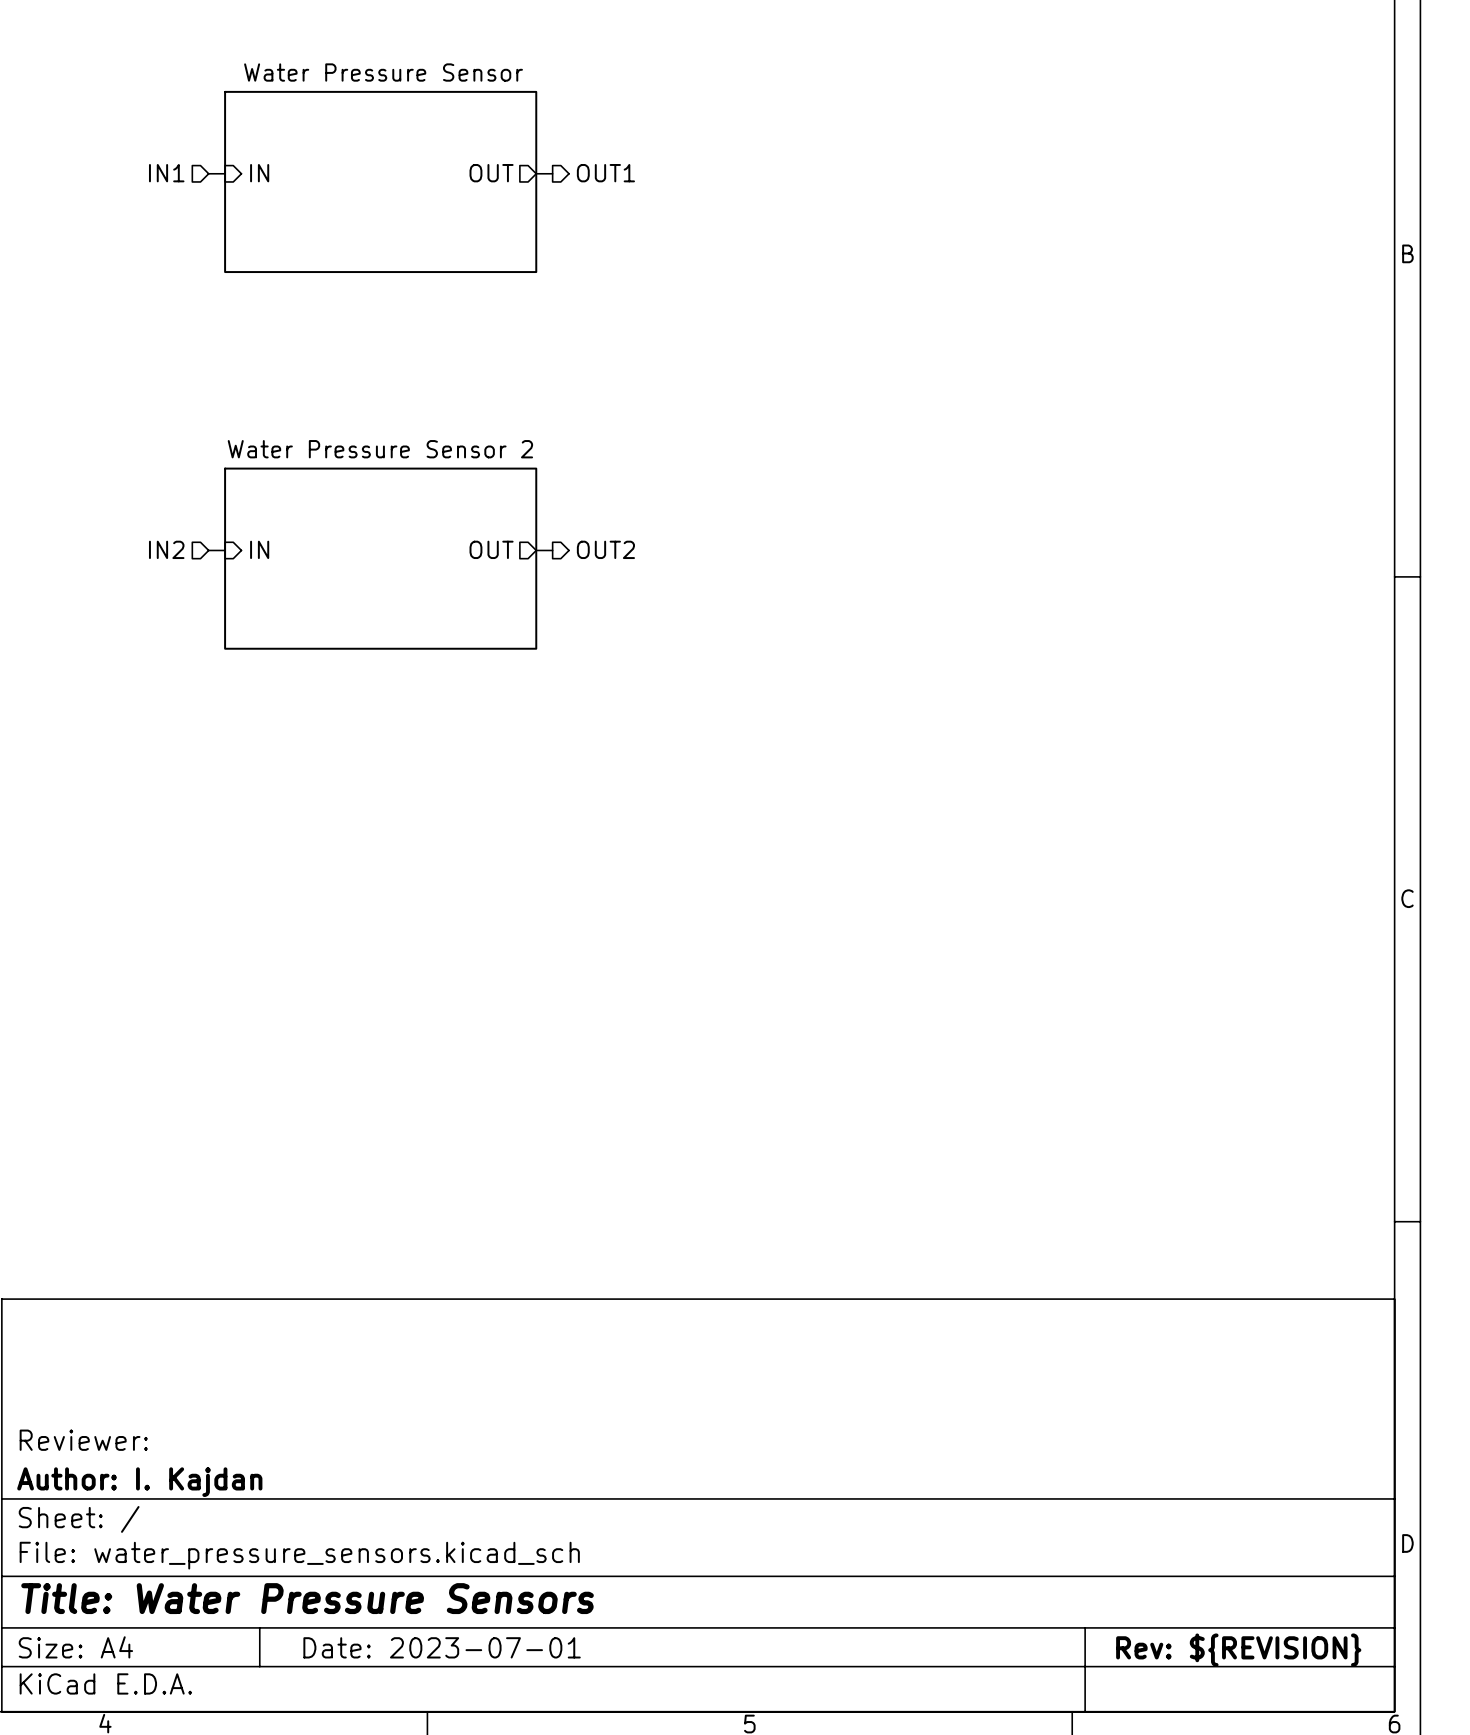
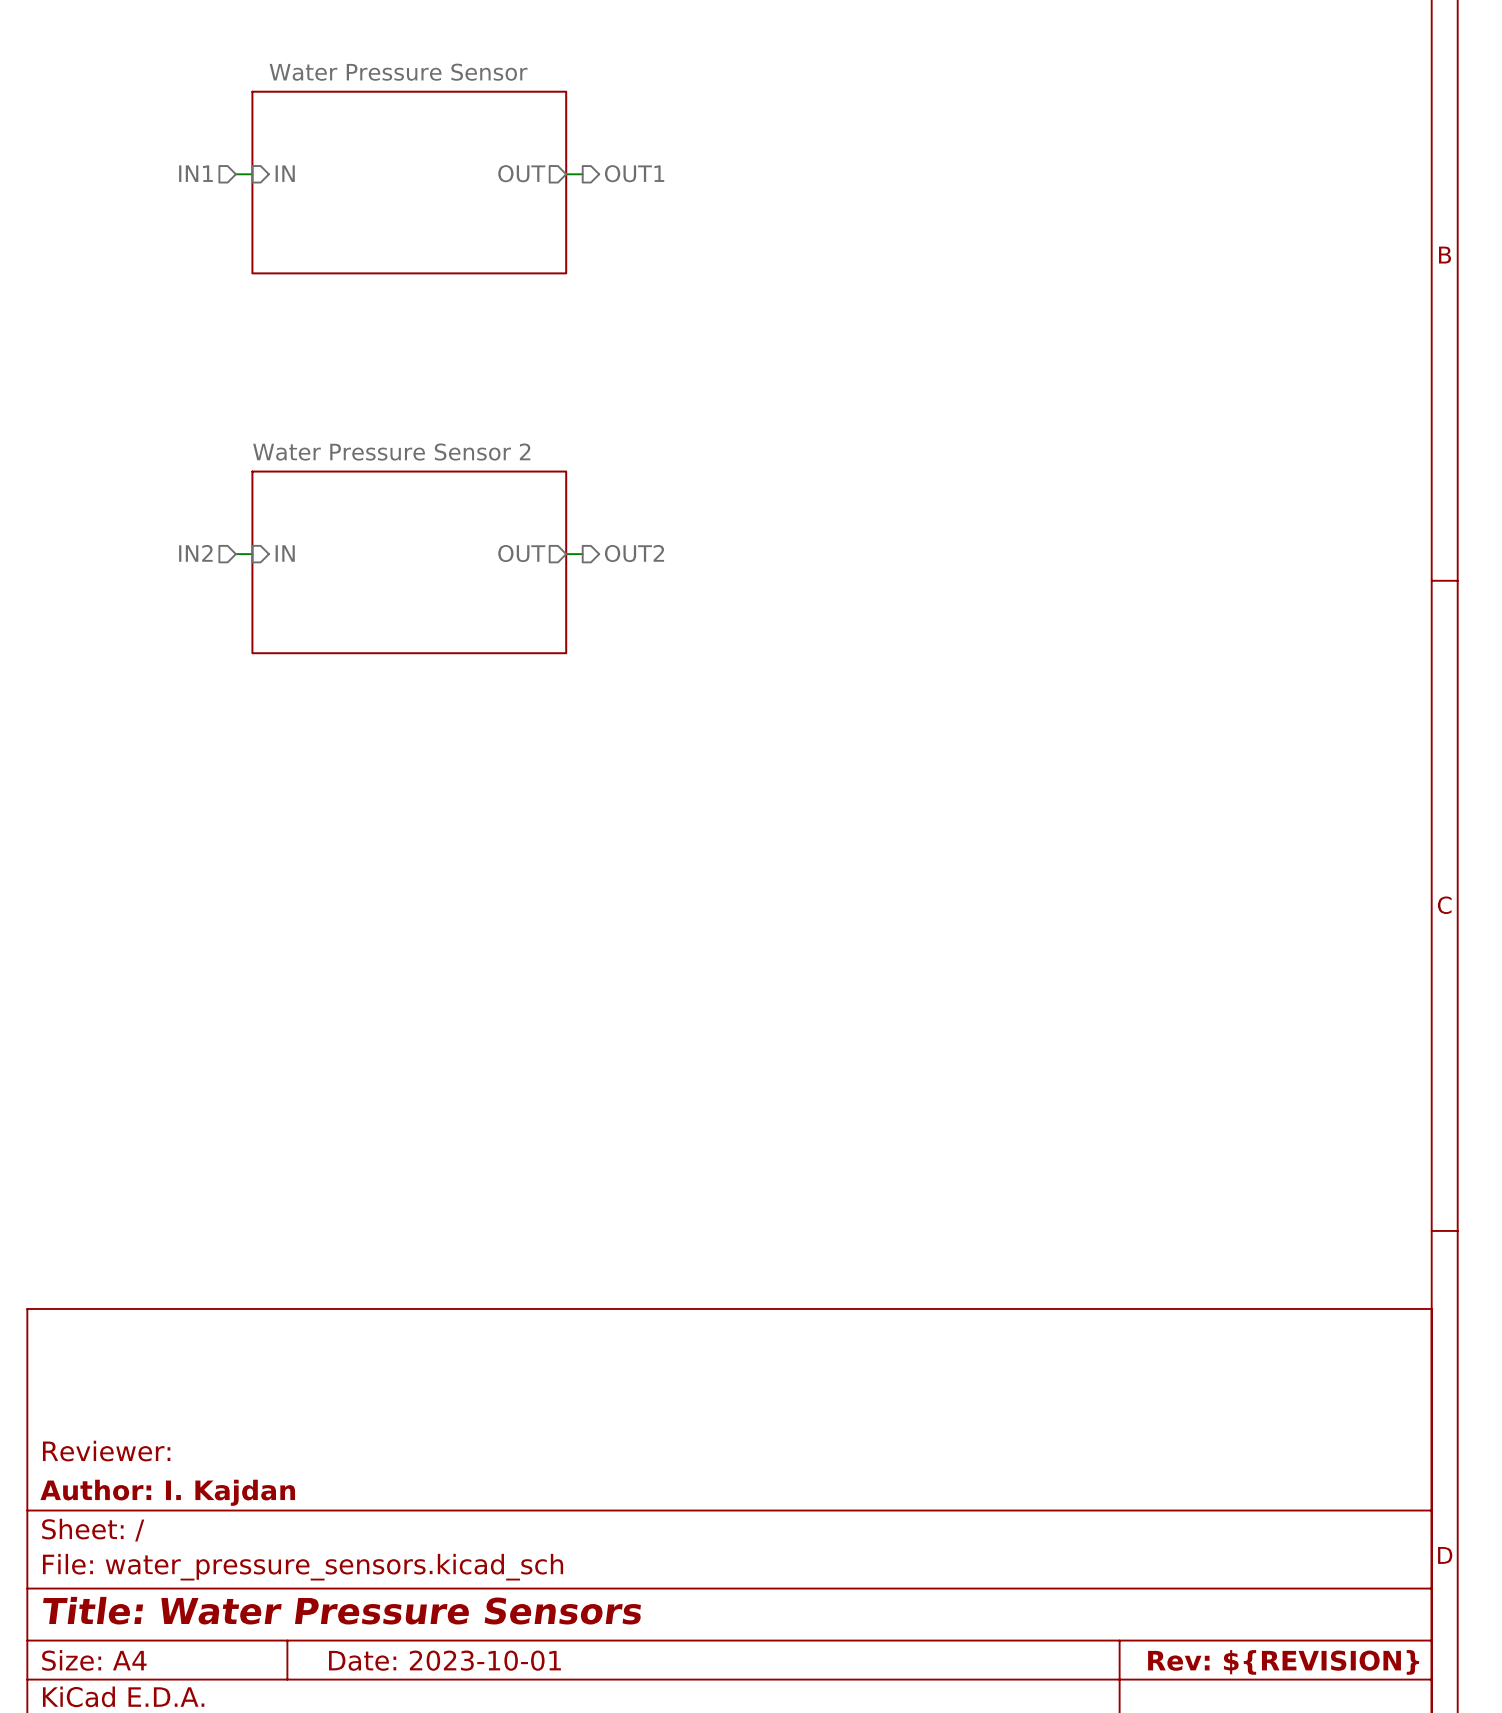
title block: Date: 2023-07-01 (442, 1647) -> Date: 2023-10-01 (444, 1660)

